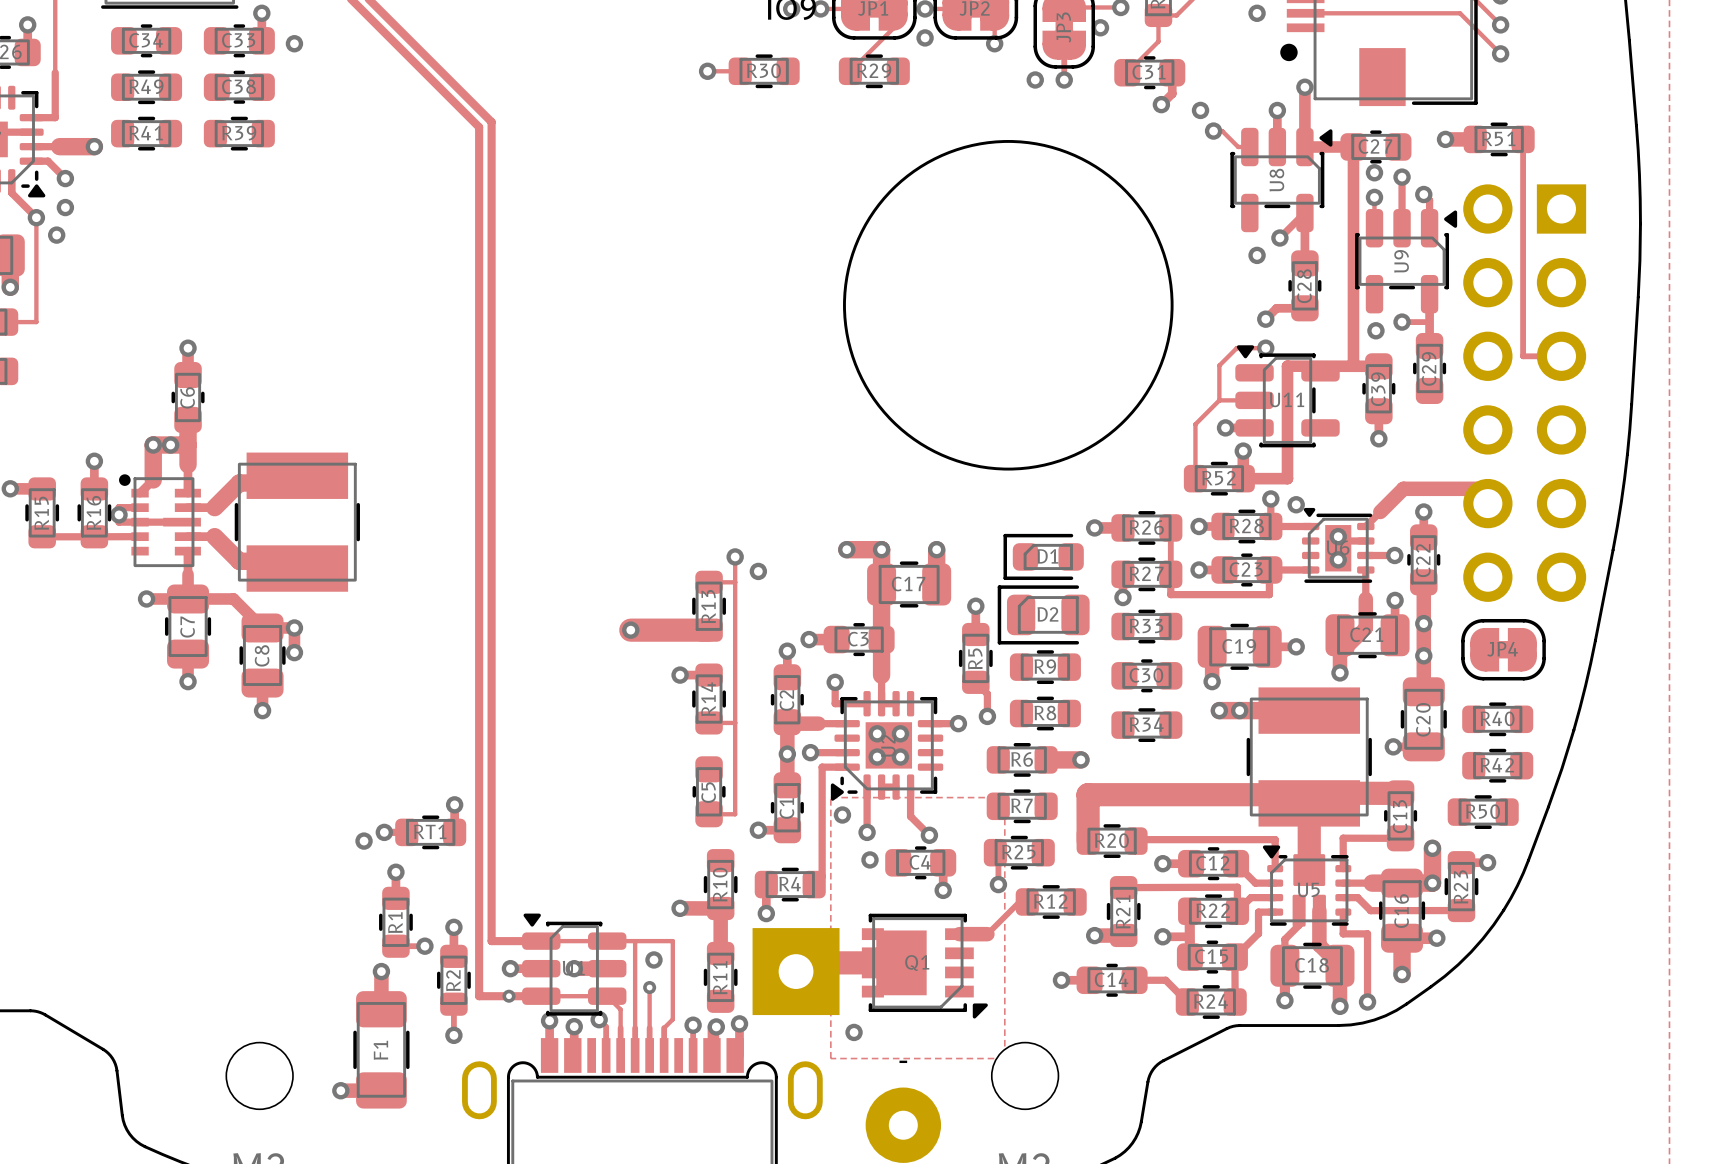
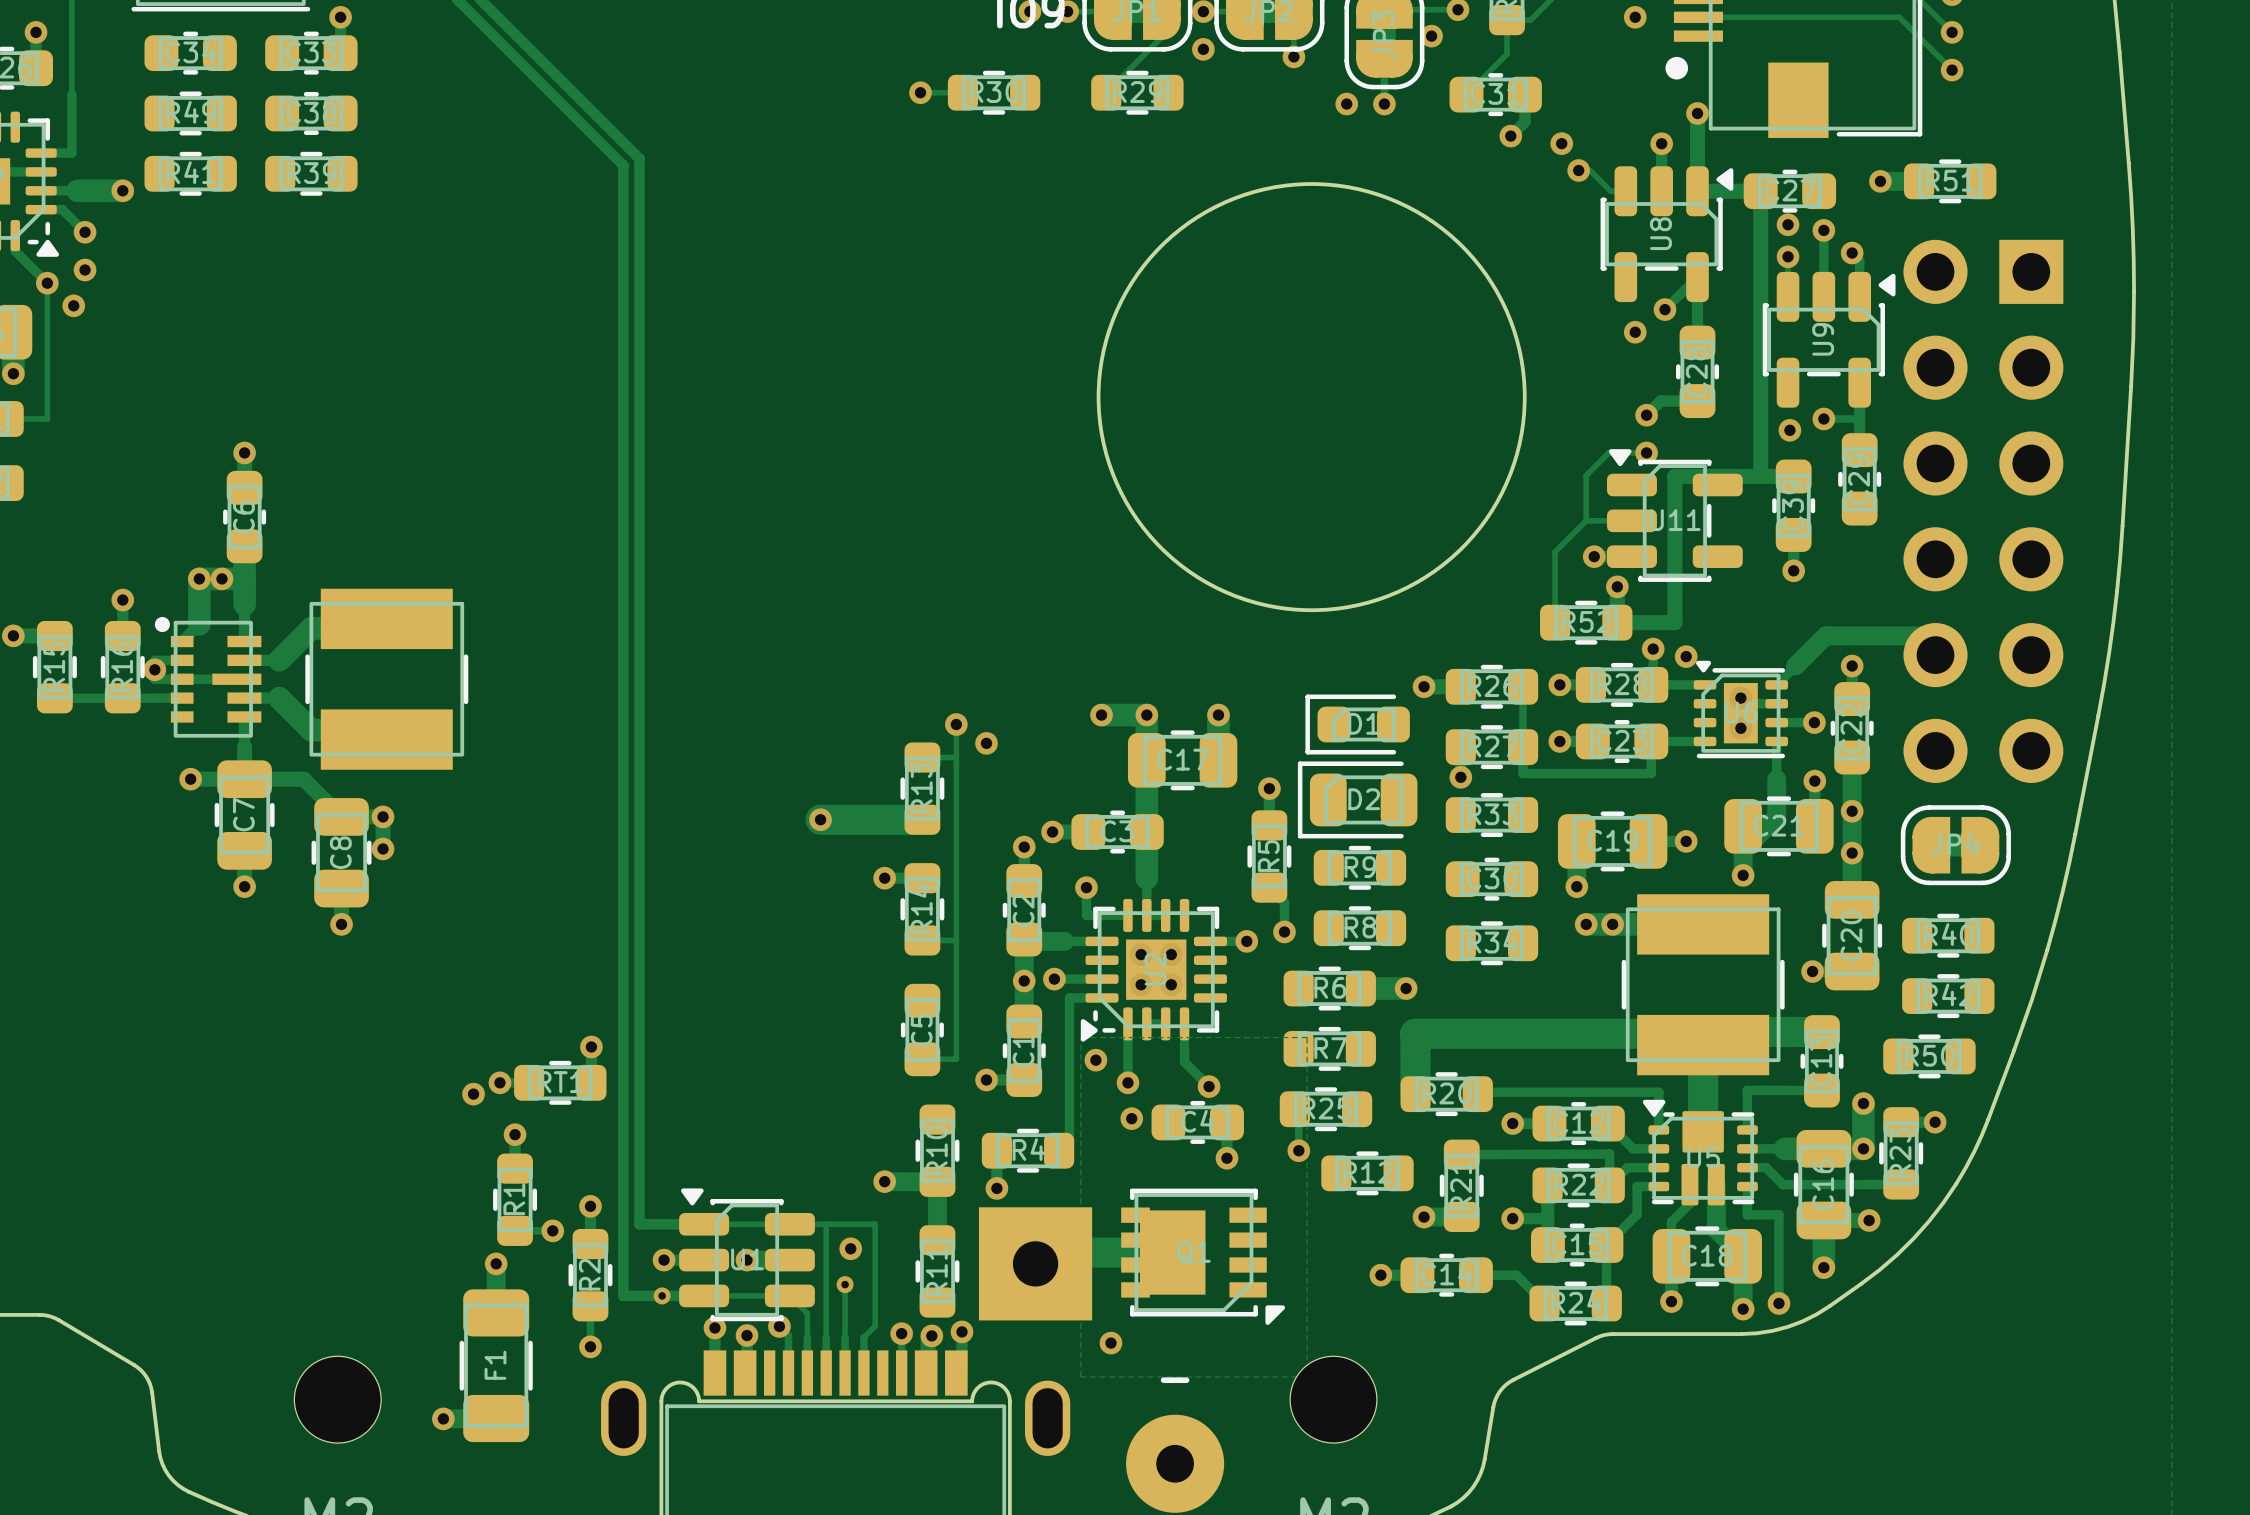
via: (294, 43) -> none
track: (1523, 139) (1523, 356) (1561, 356) -> none
track: (1027, 901) (1019, 901) (987, 934) (959, 934) -> none

